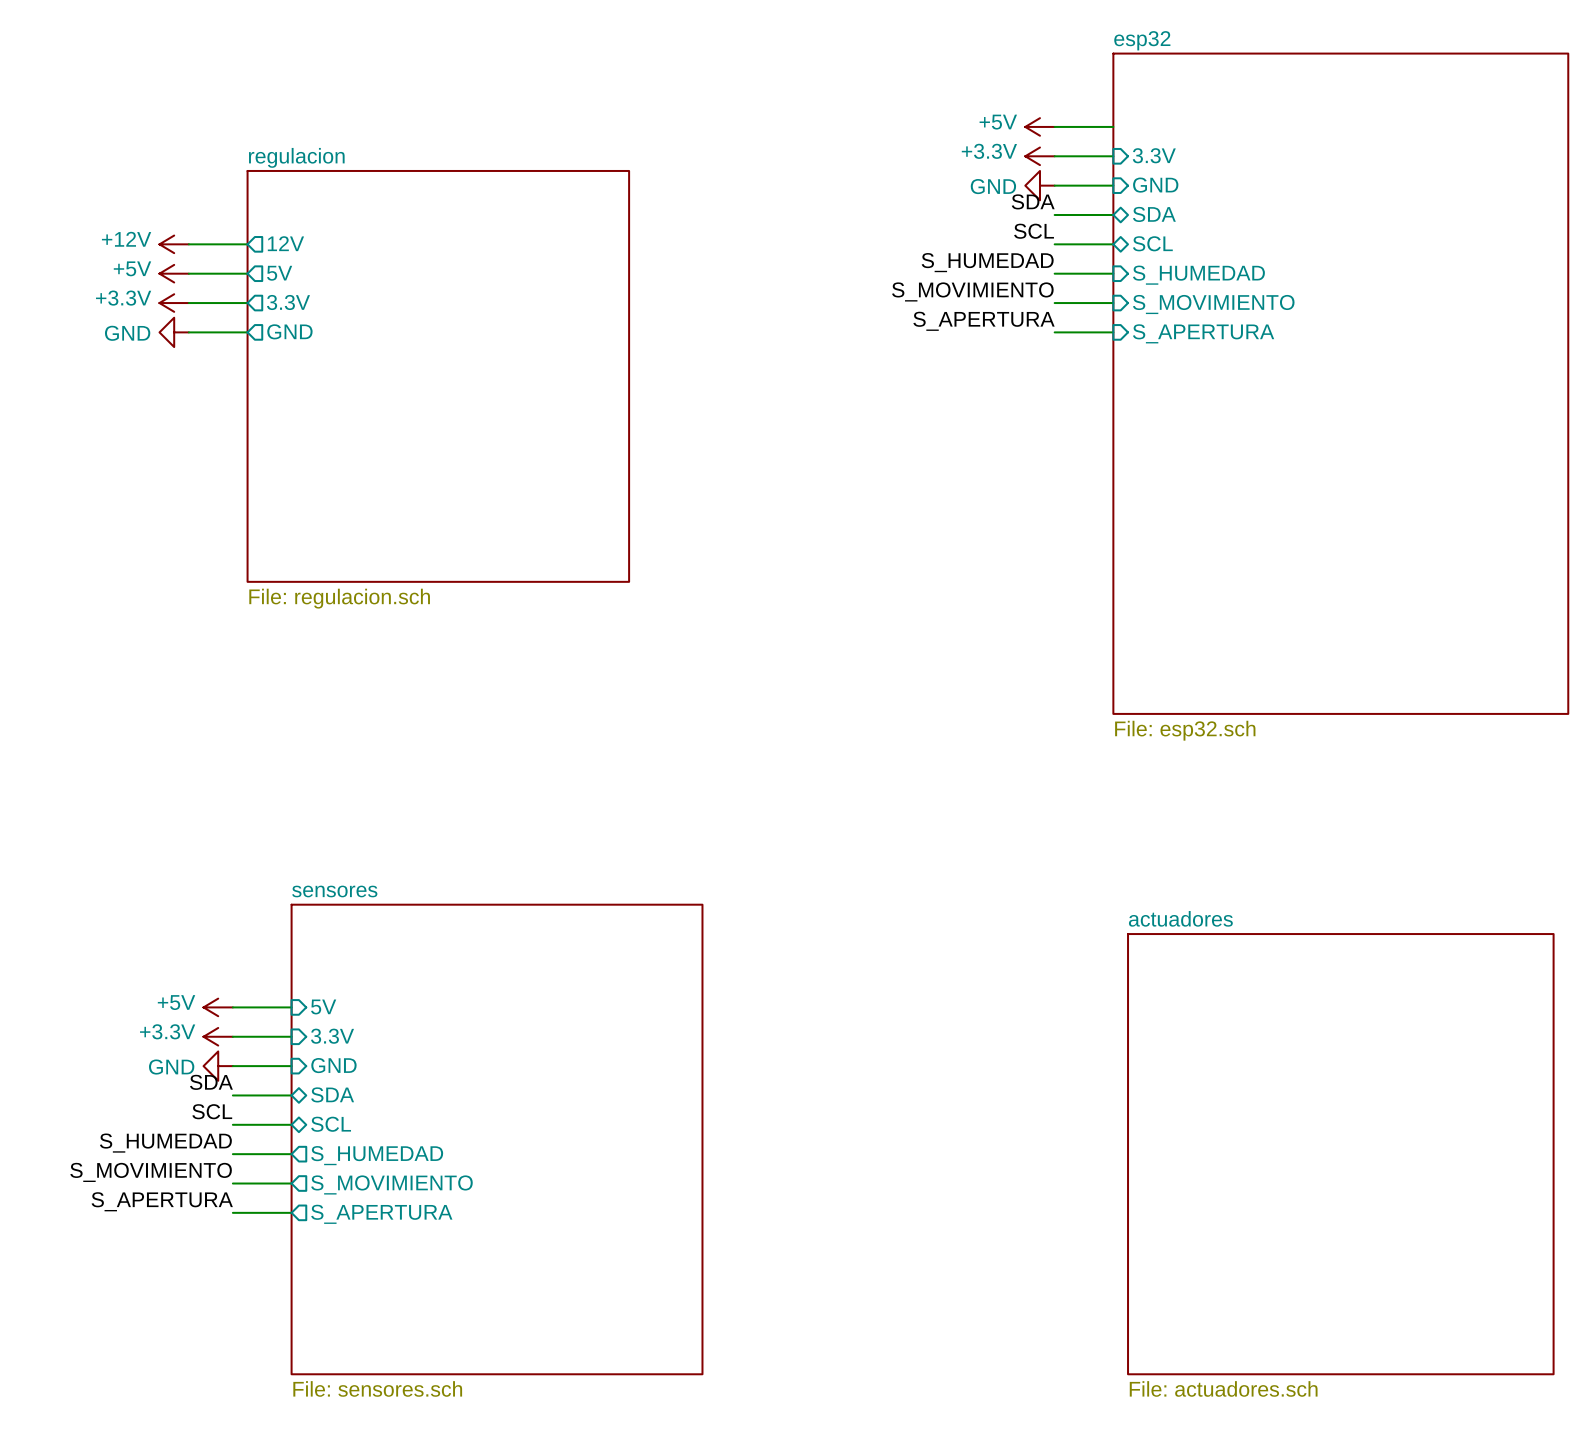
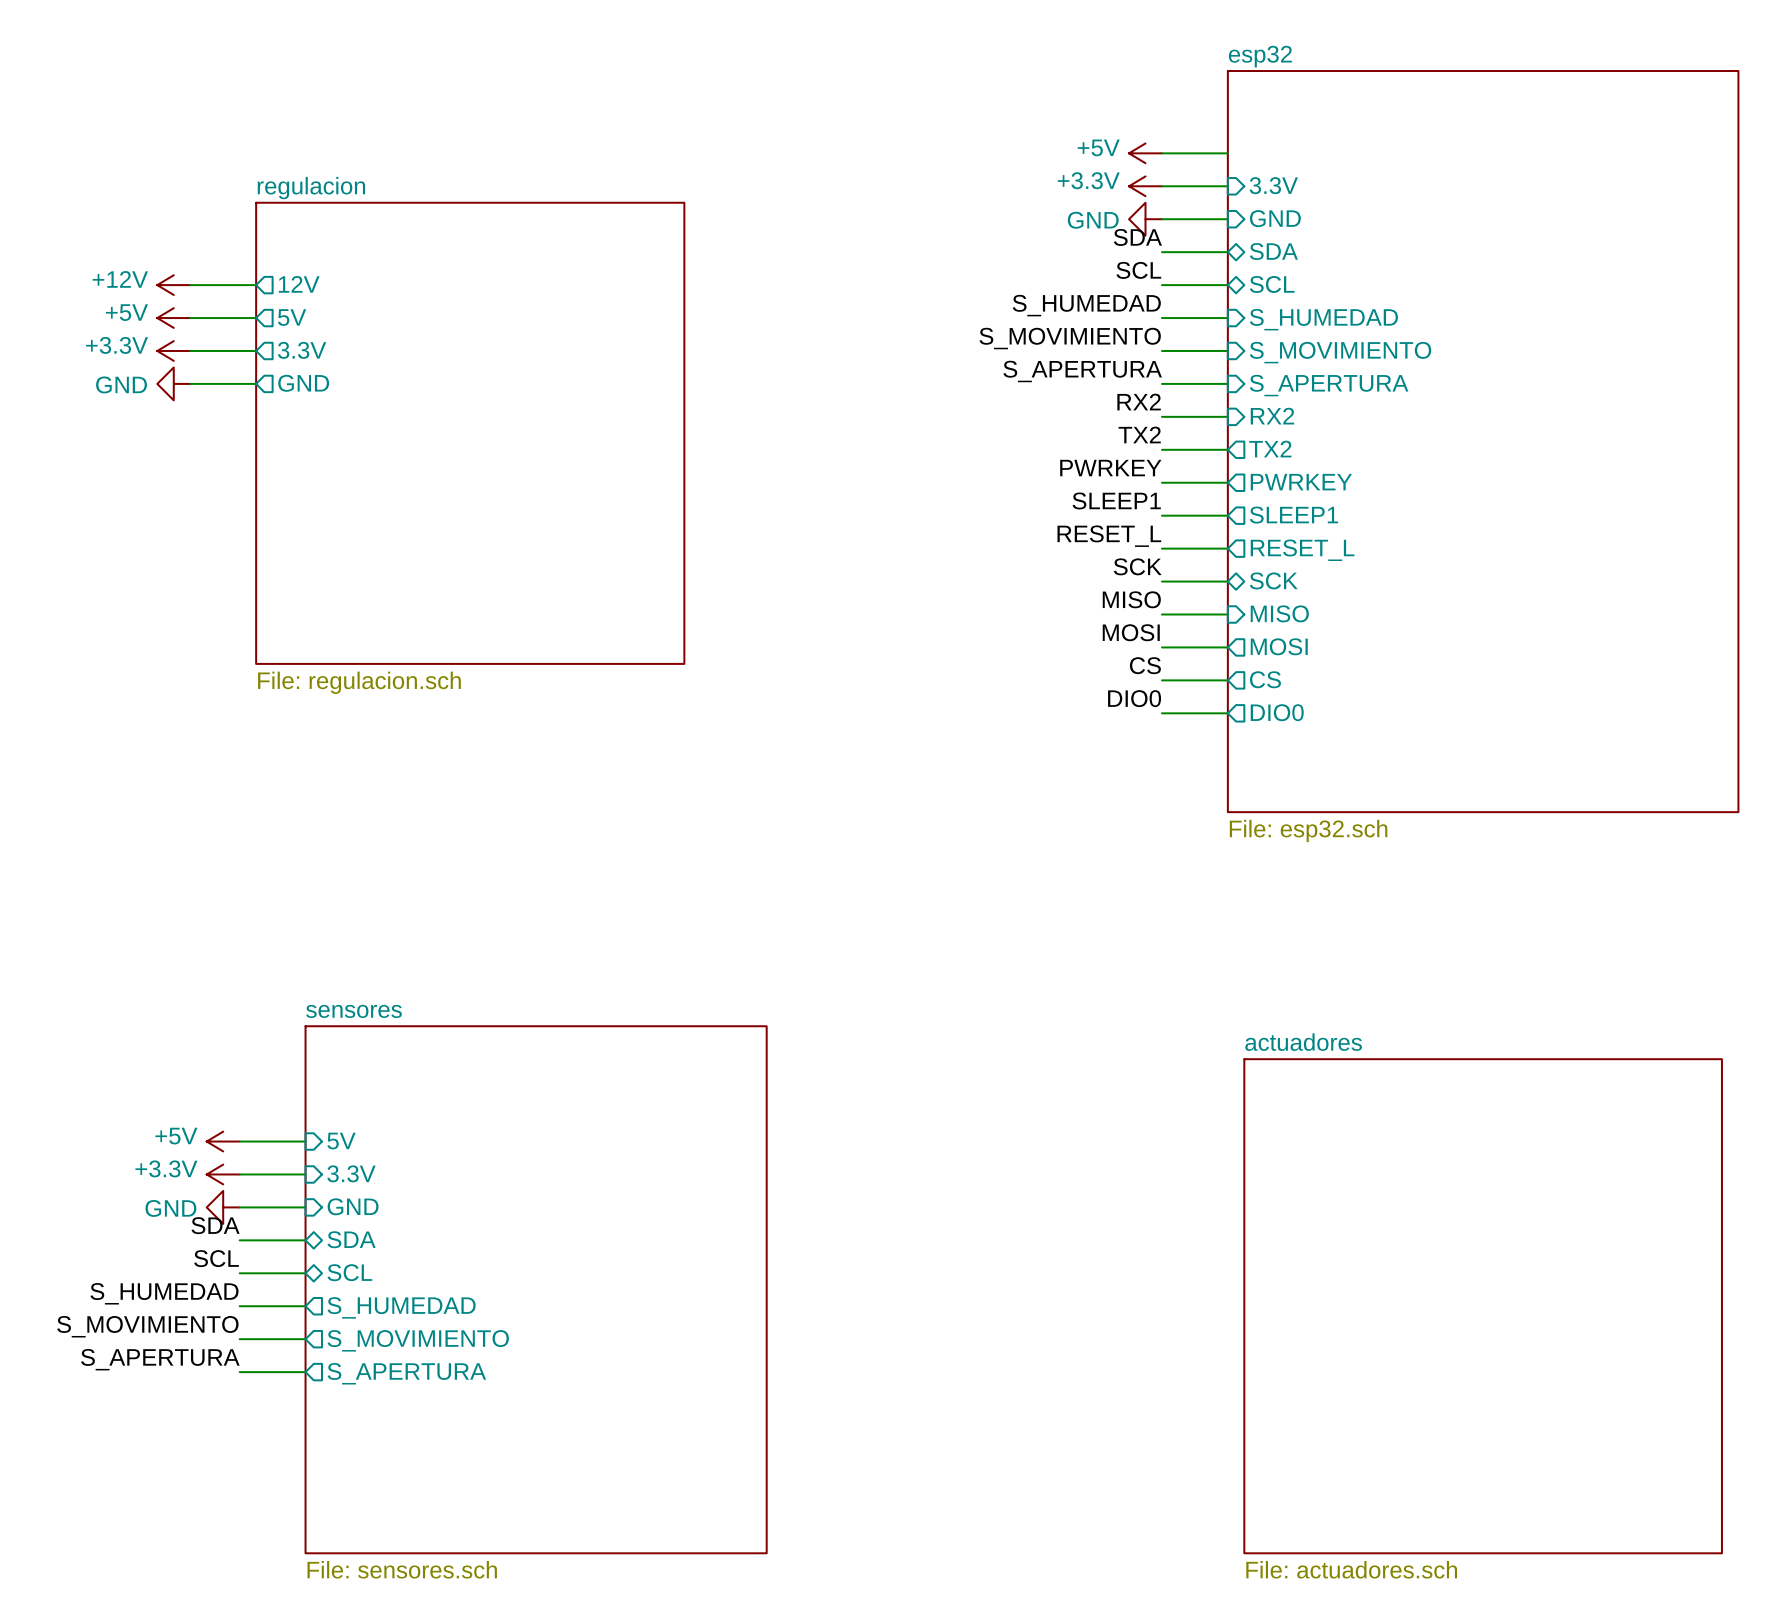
label: none -> RX2 (1139, 402)
wire: none -> (1161, 416) (1227, 416)
sheet pin: none -> RX2 (1272, 416)
label: none -> TX2 (1139, 434)
sheet pin: none -> TX2 (1270, 449)
wire: none -> (1161, 449) (1227, 449)
label: none -> PWRKEY (1110, 468)
sheet pin: none -> PWRKEY (1301, 482)
wire: none -> (1161, 482) (1227, 482)
label: none -> SLEEP1 (1116, 500)
wire: none -> (1161, 515) (1227, 515)
sheet pin: none -> SLEEP1 (1293, 515)
label: none -> RESET_L (1109, 536)
wire: none -> (1161, 548) (1227, 548)
sheet pin: none -> RESET_L (1302, 550)
label: none -> SCK (1137, 566)
sheet pin: none -> SCK (1273, 580)
wire: none -> (1161, 581) (1227, 581)
label: none -> MISO (1131, 599)
wire: none -> (1161, 614) (1227, 614)
sheet pin: none -> MISO (1279, 613)
label: none -> MOSI (1131, 632)
sheet pin: none -> MOSI (1279, 646)
wire: none -> (1161, 647) (1227, 647)
label: none -> CS (1145, 665)
sheet pin: none -> CS (1265, 679)
wire: none -> (1161, 680) (1227, 680)
label: none -> DIO0 (1134, 698)
wire: none -> (1161, 713) (1227, 713)
sheet pin: none -> DIO0 (1277, 712)

